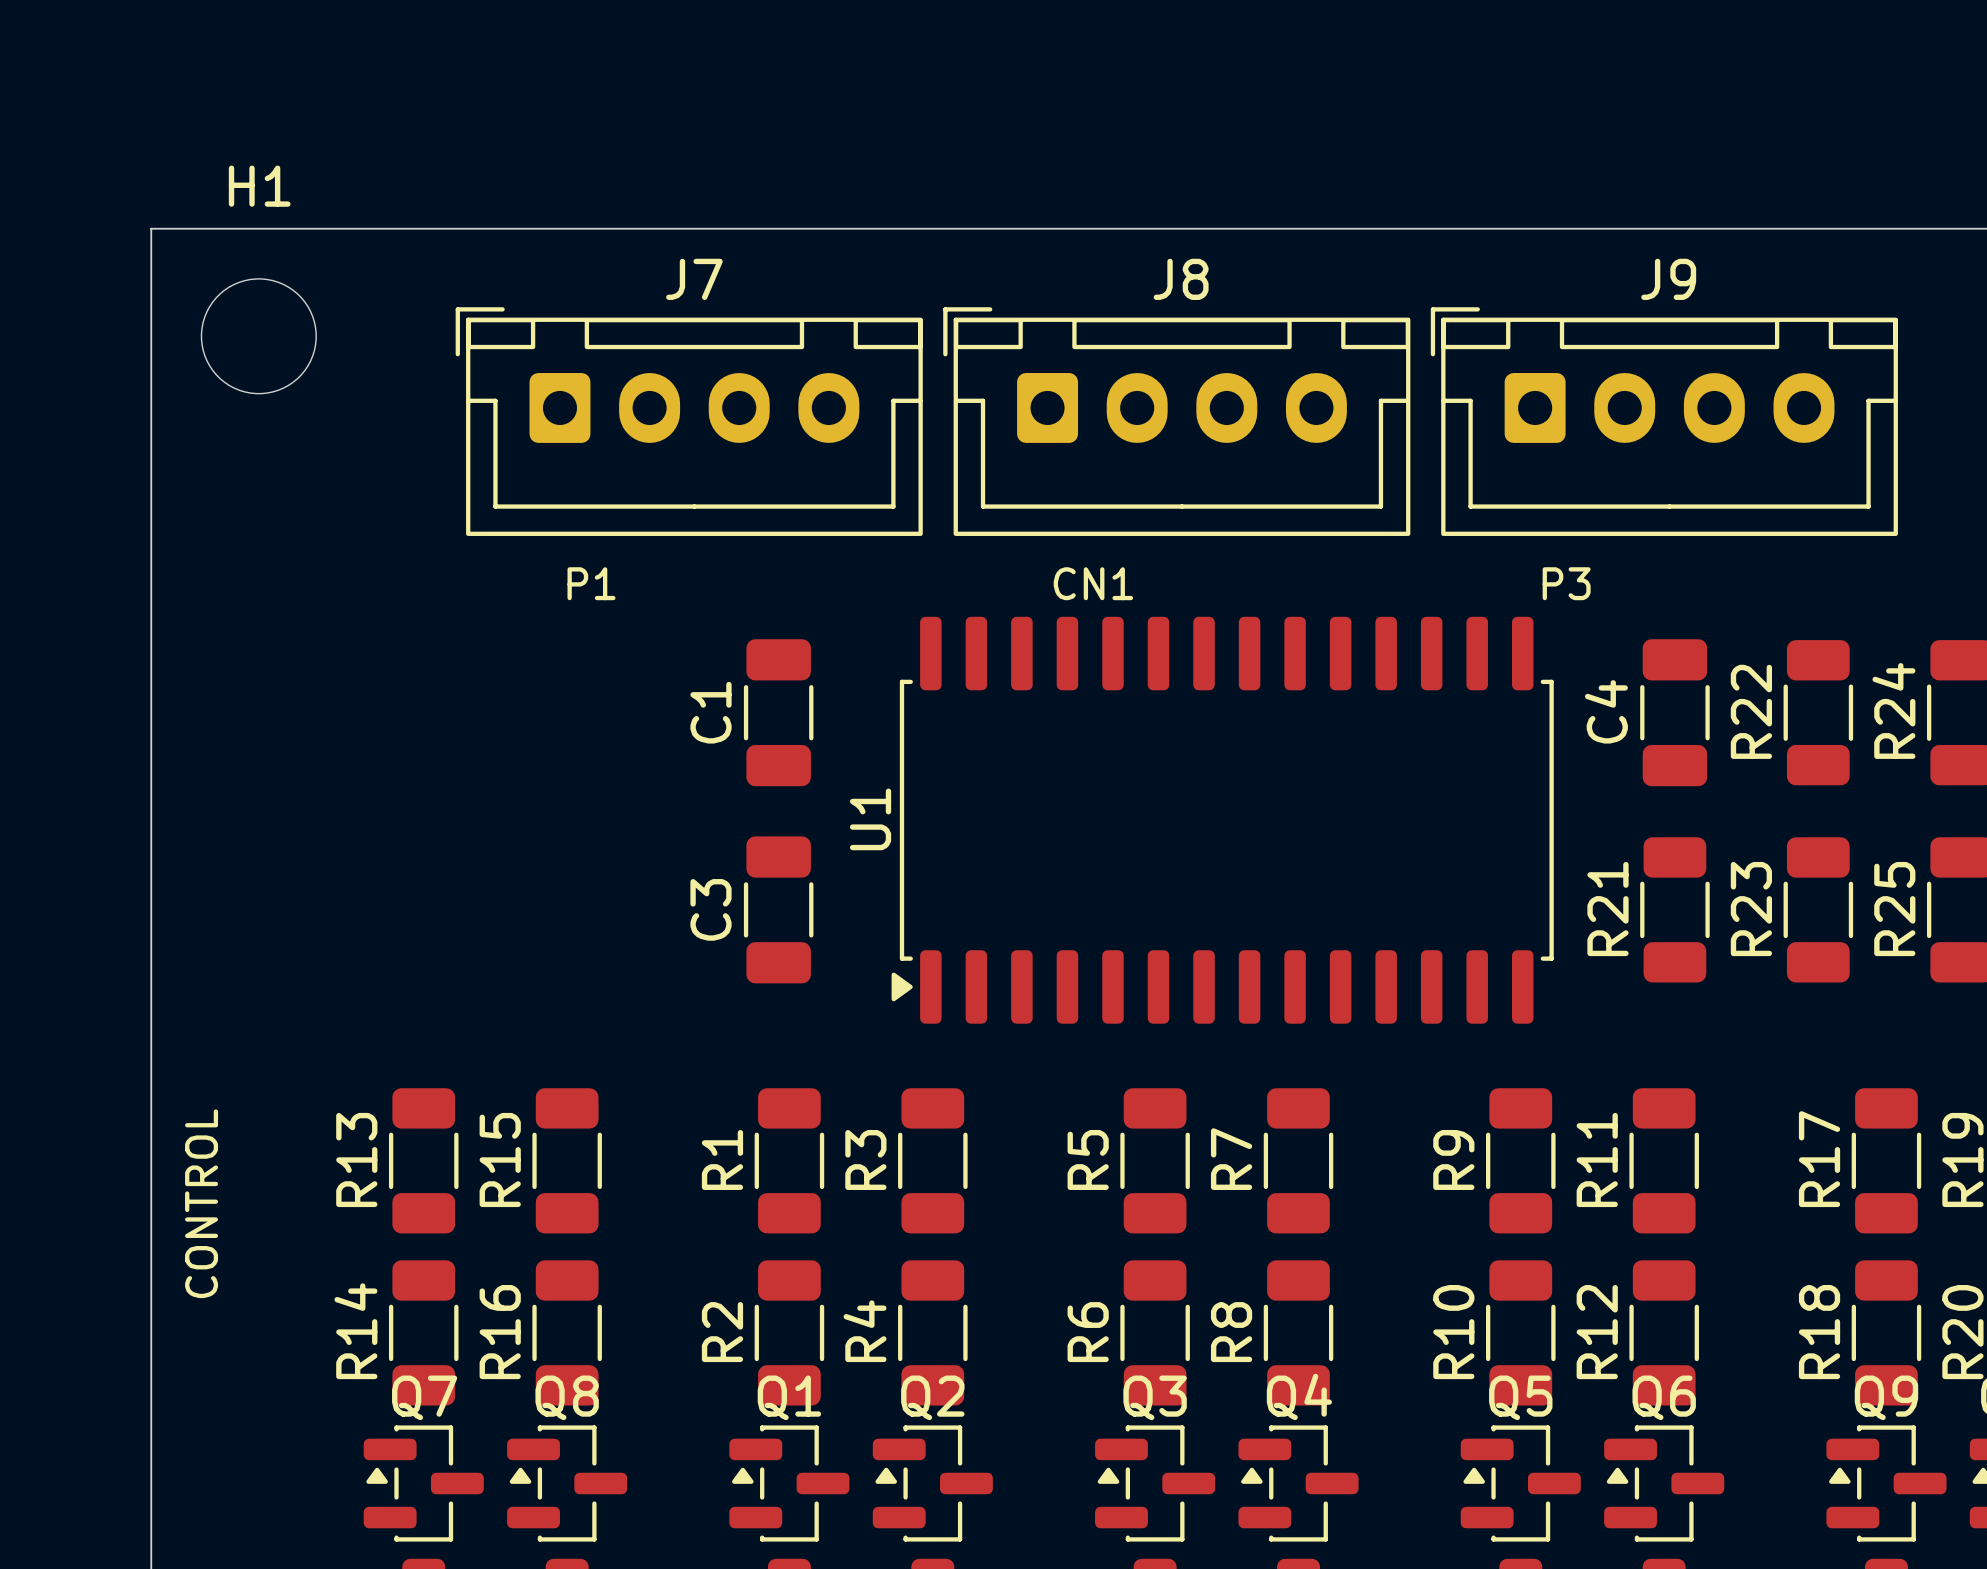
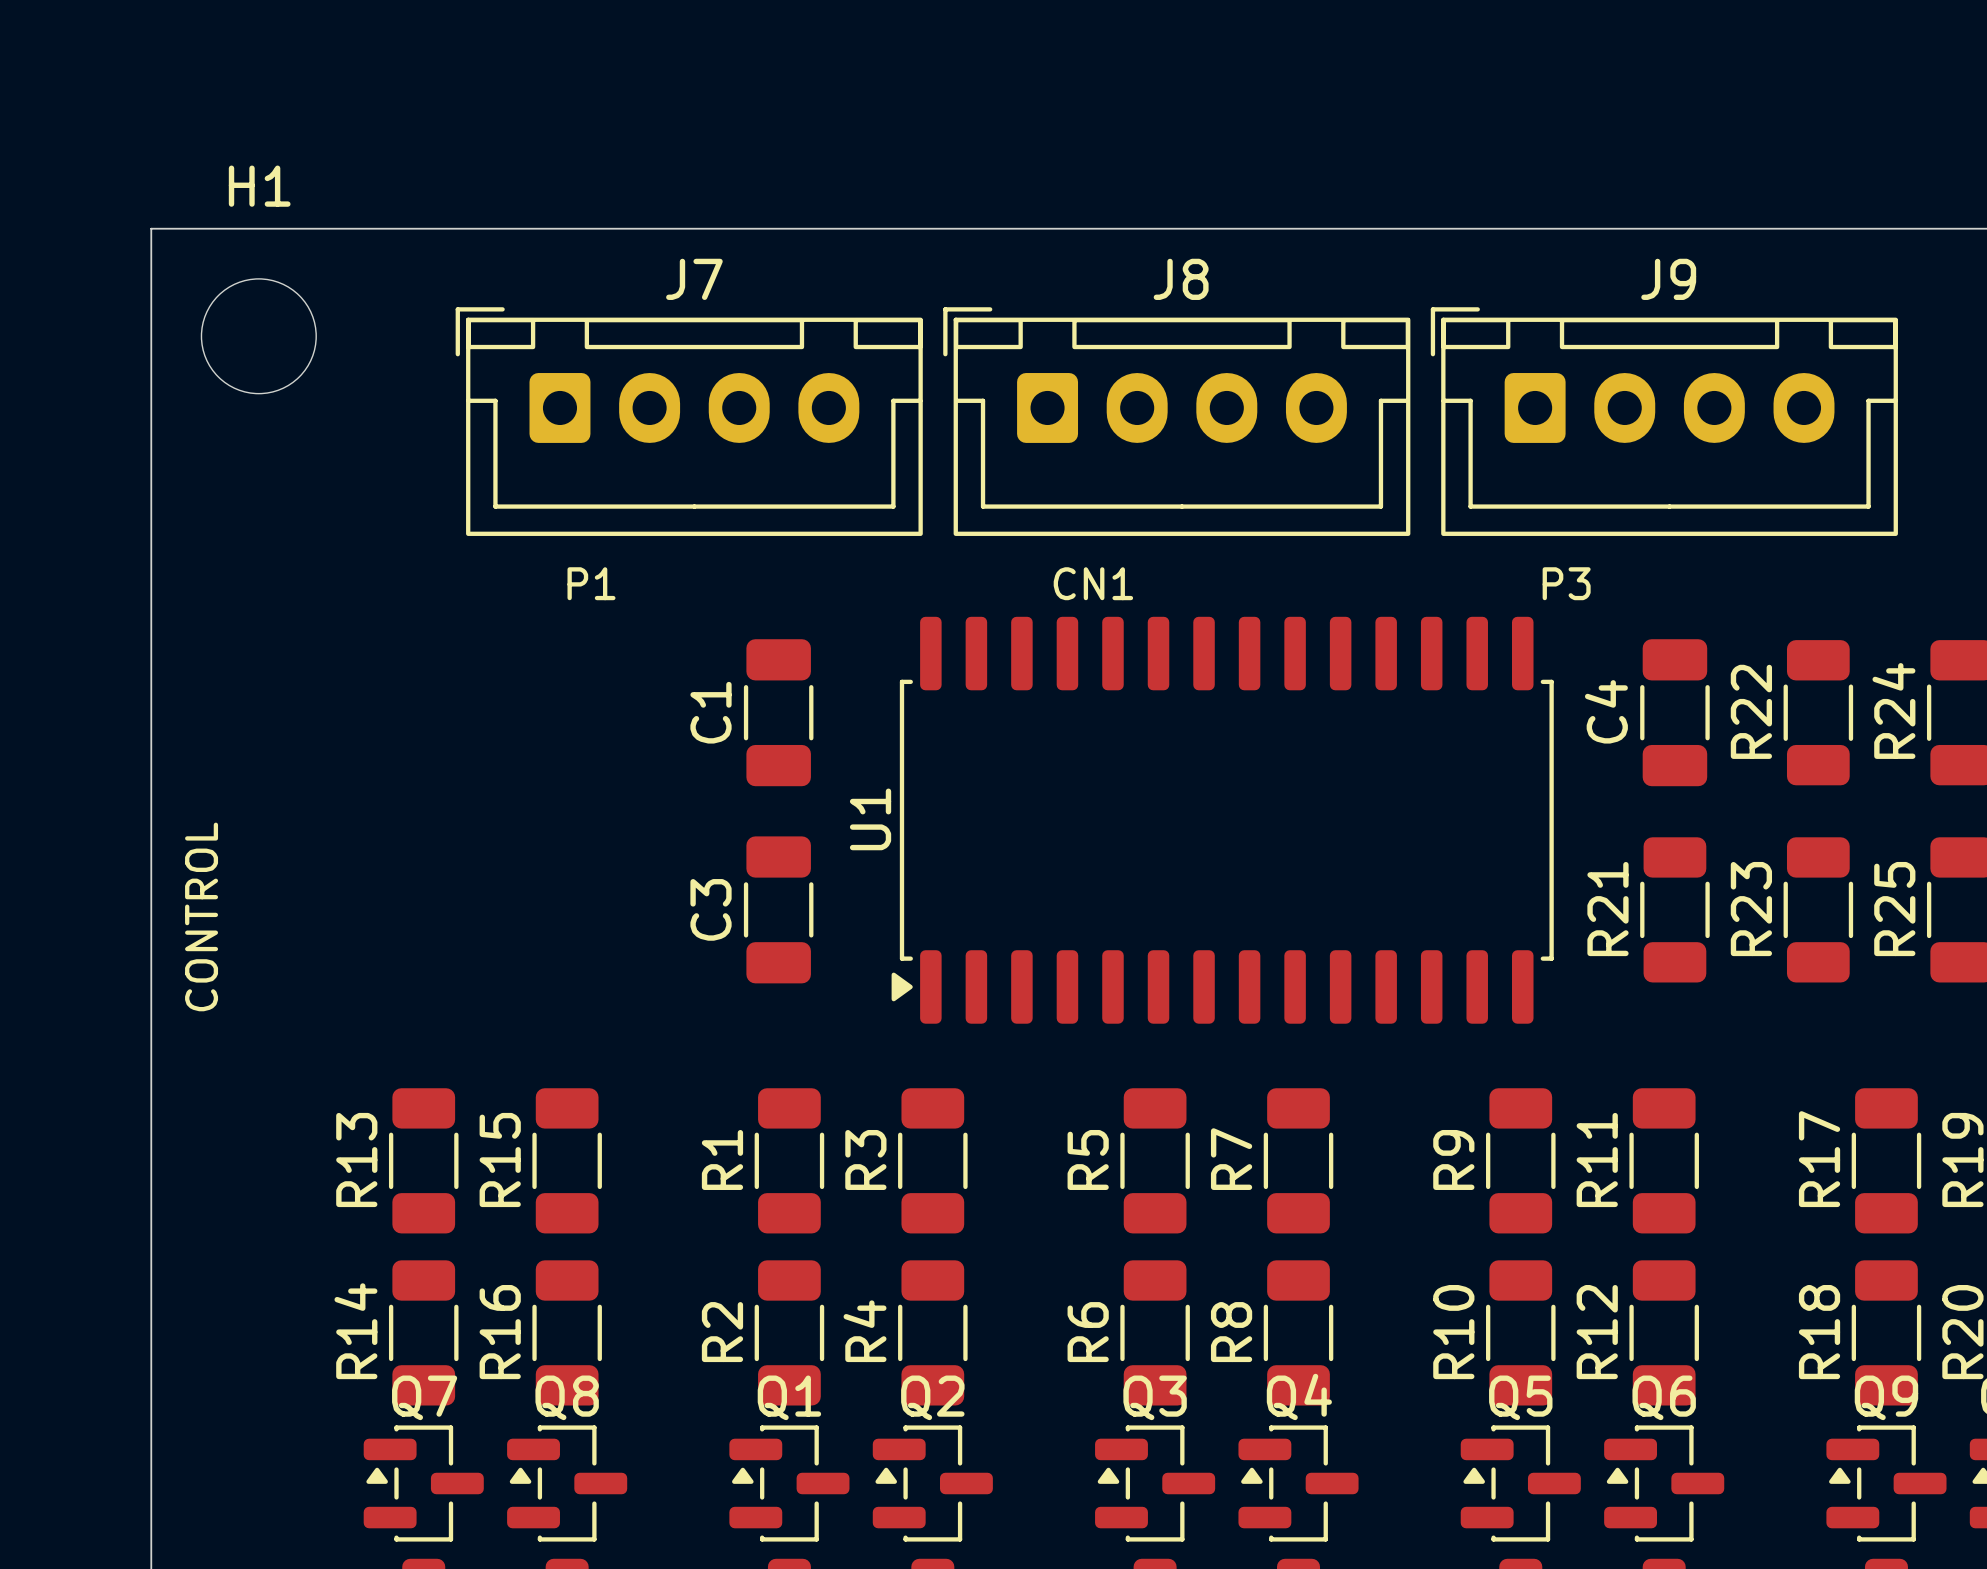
text position: CONTROL (201, 1203) -> CONTROL (201, 916)

